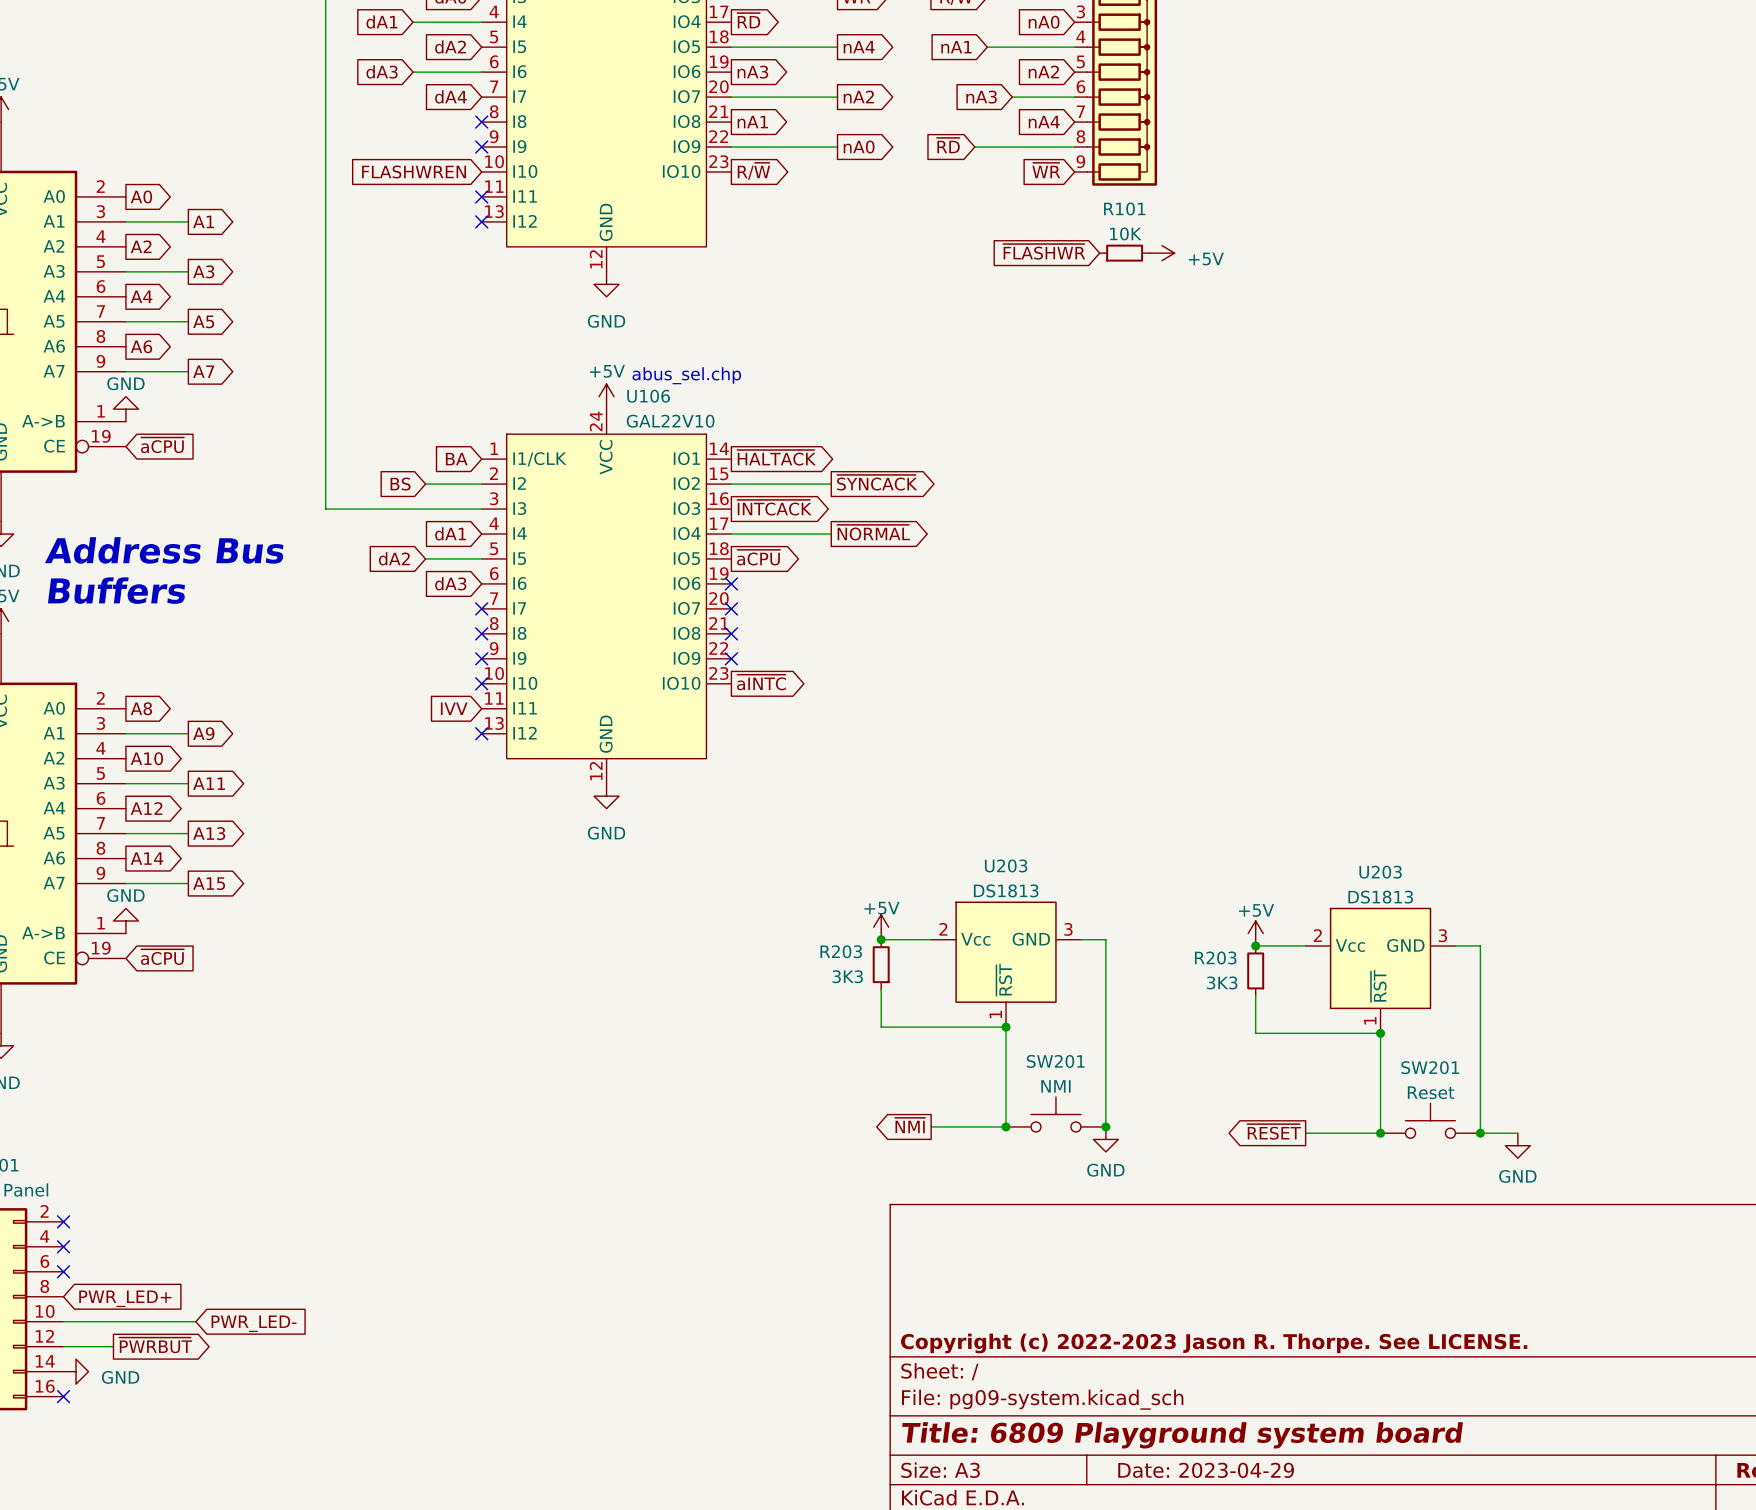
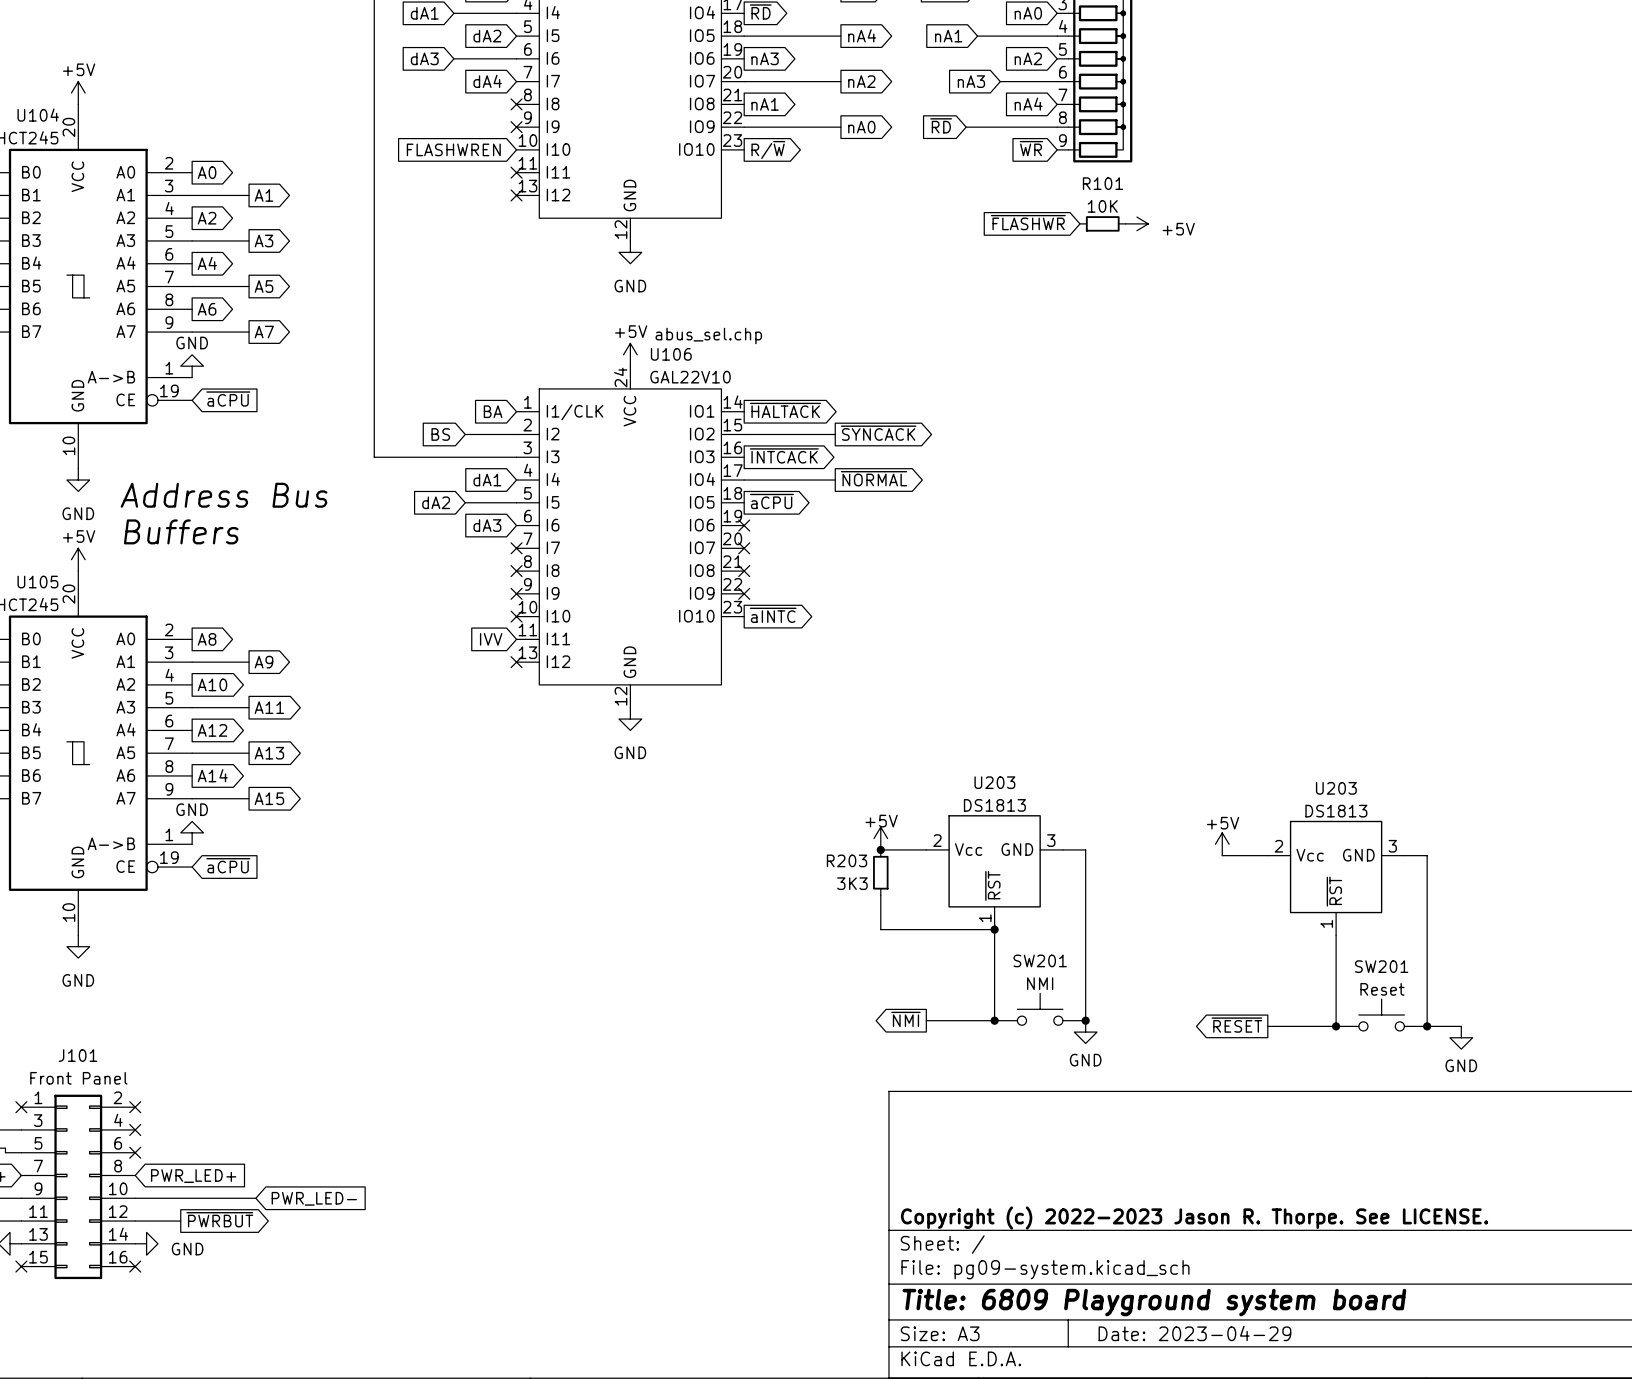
junction: (1255, 945) -> none
R203: 3K3 (1255, 970) -> none
wire: (1255, 995) (1255, 1033) (1380, 1033) -> none
junction: (1380, 1033) -> none

